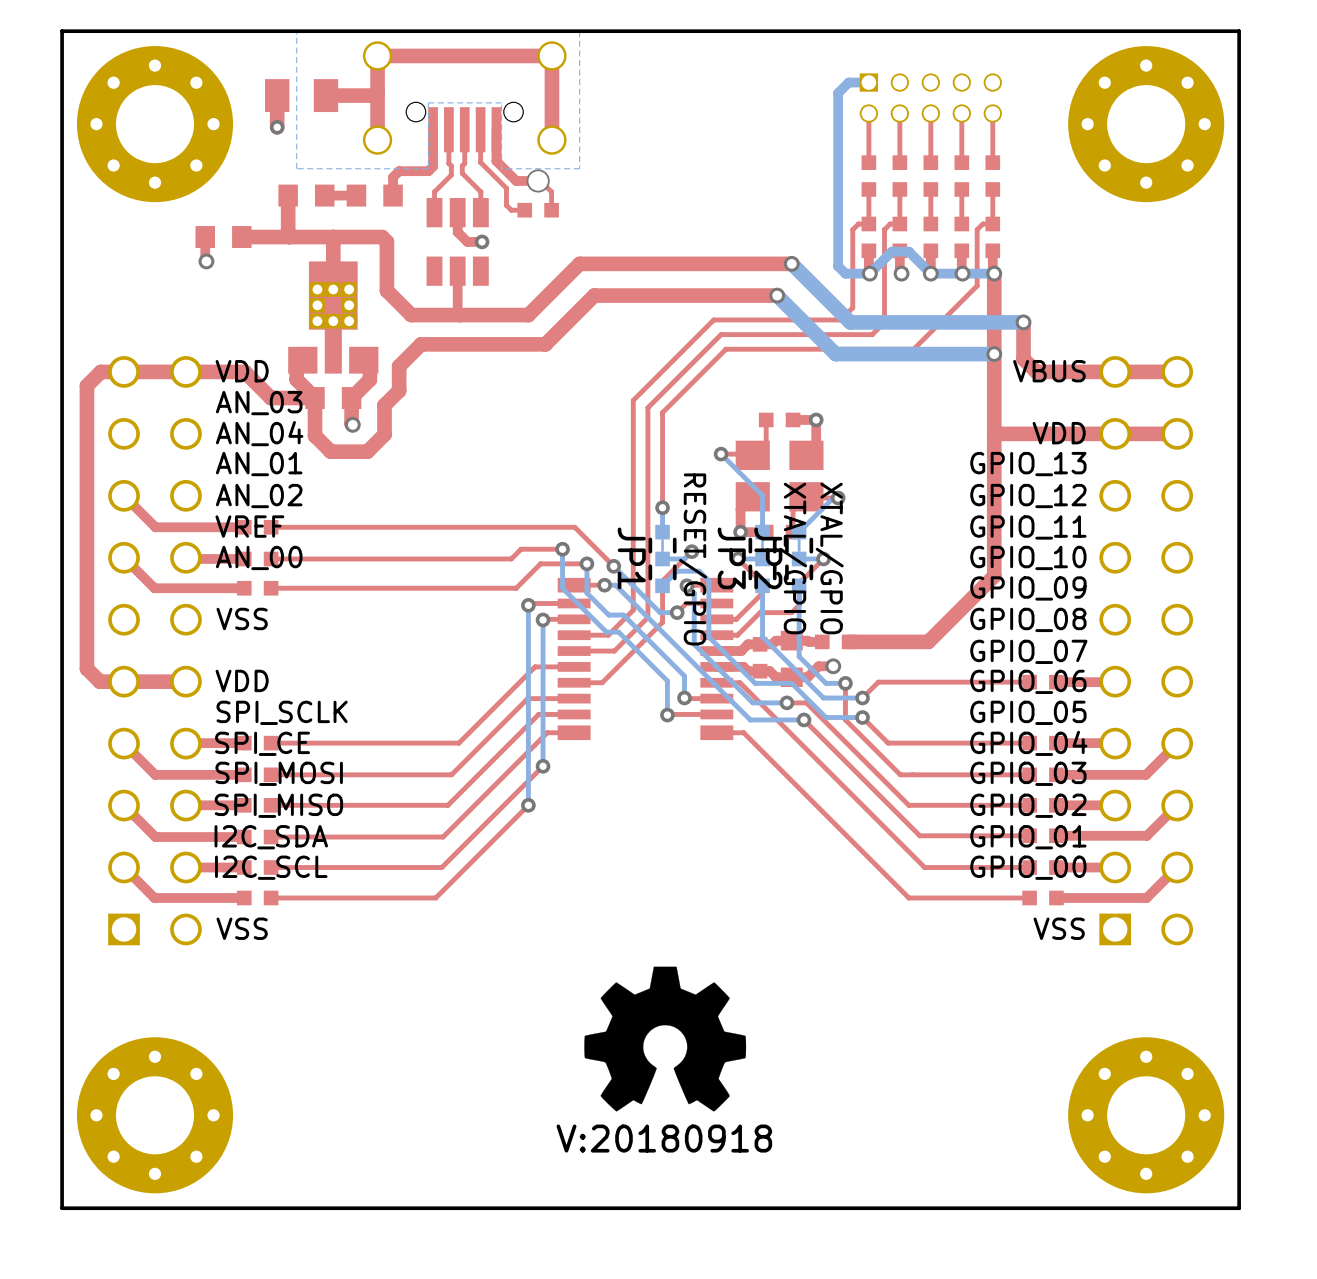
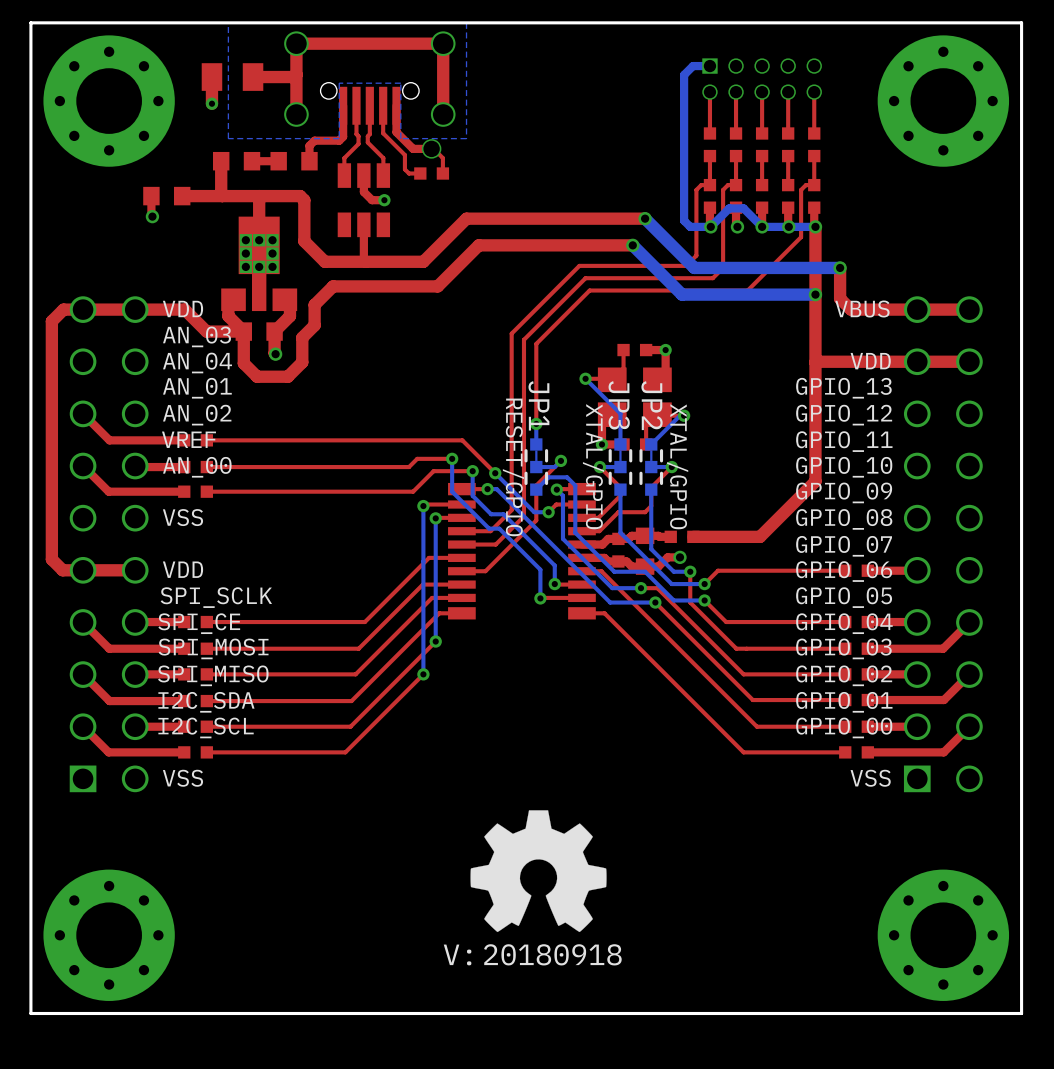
JP1 name position: JP1 (631, 558) -> JP1 (538, 405)
JP3 name position: JP3 (731, 558) -> JP3 (619, 405)
JP2 name position: JP2 (768, 558) -> JP2 (652, 405)
JP3 value position: XTAL/GPIO (793, 558) -> XTAL/GPIO (593, 466)
JP1 value position: RESET/GPIO (693, 559) -> RESET/GPIO (513, 467)

